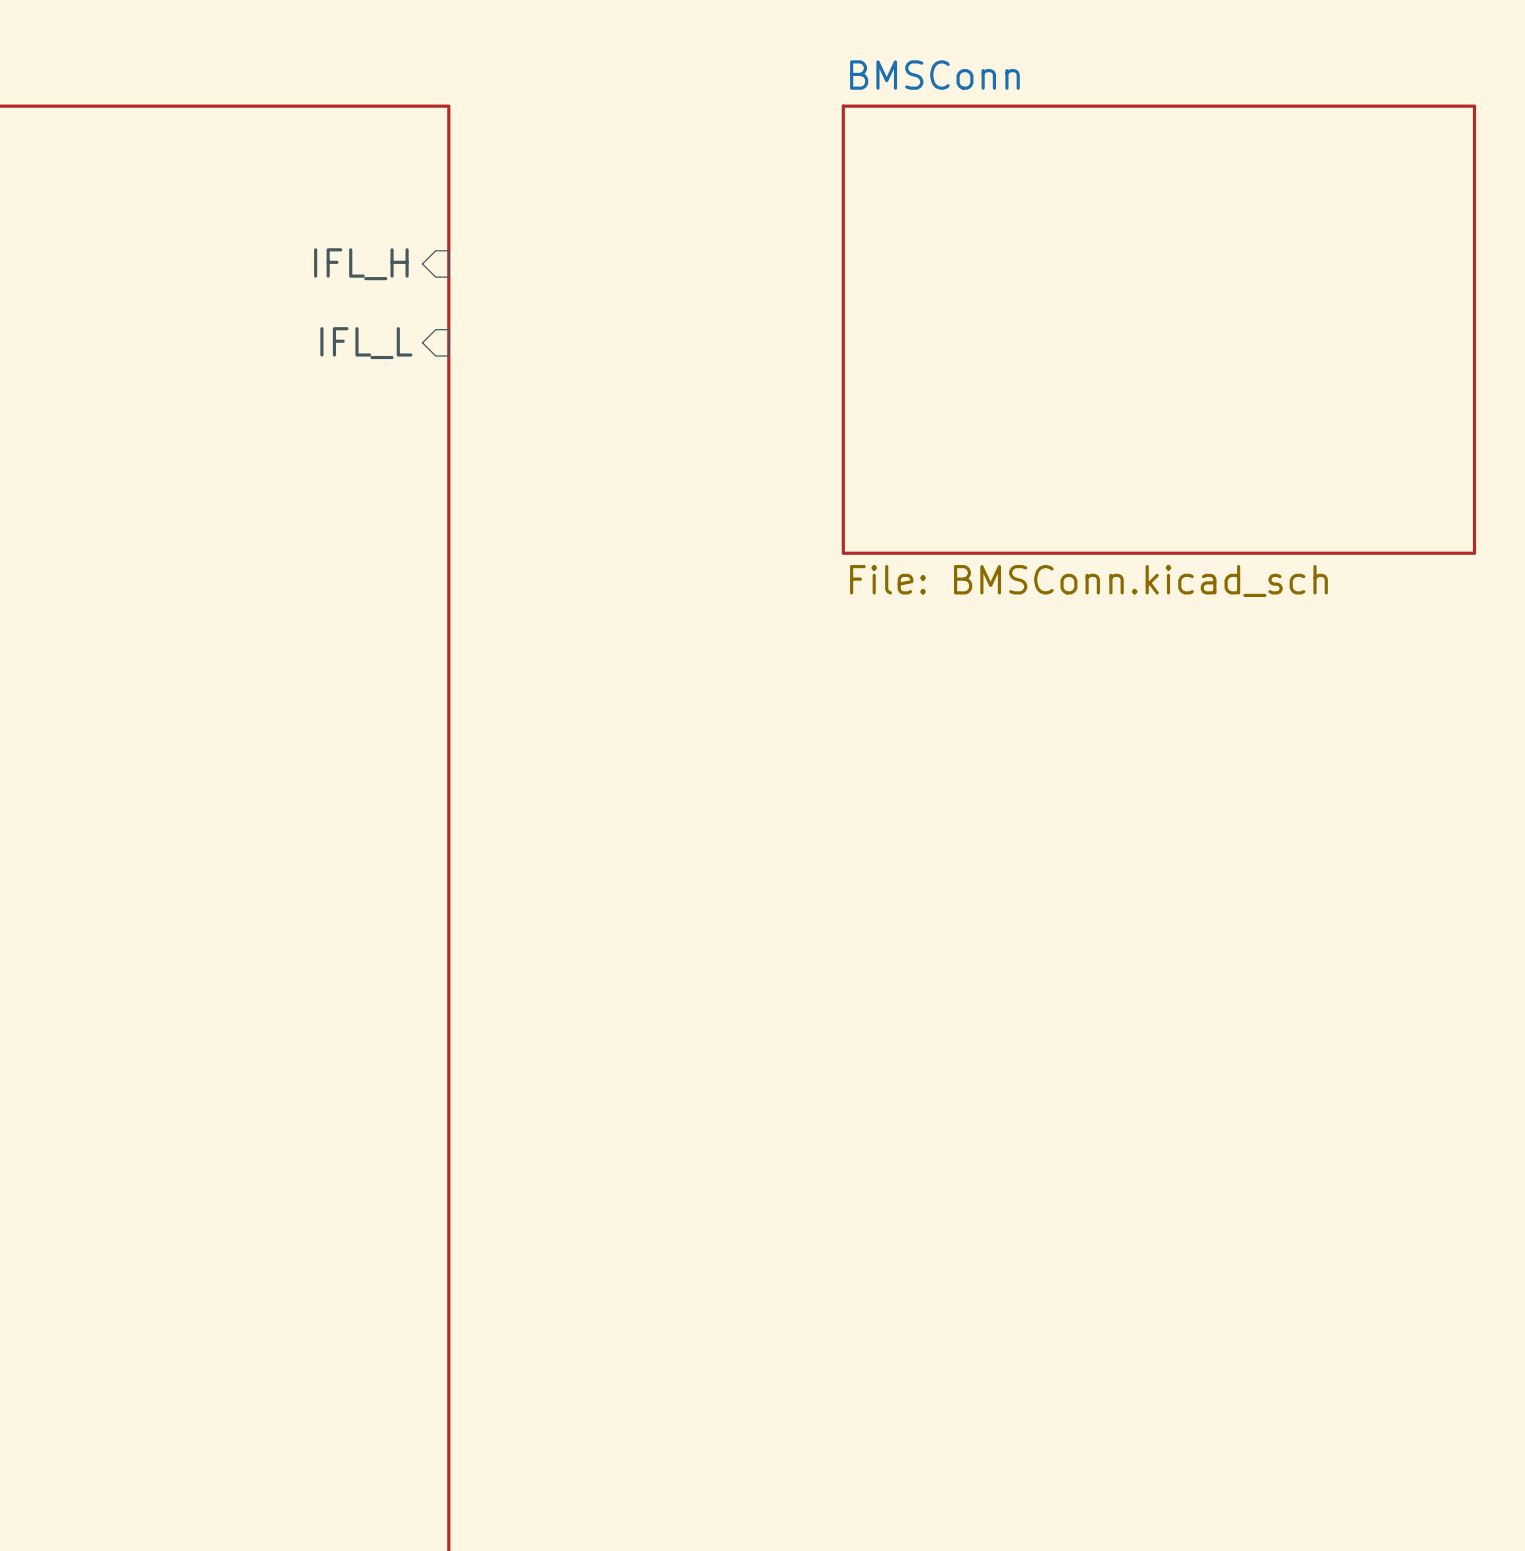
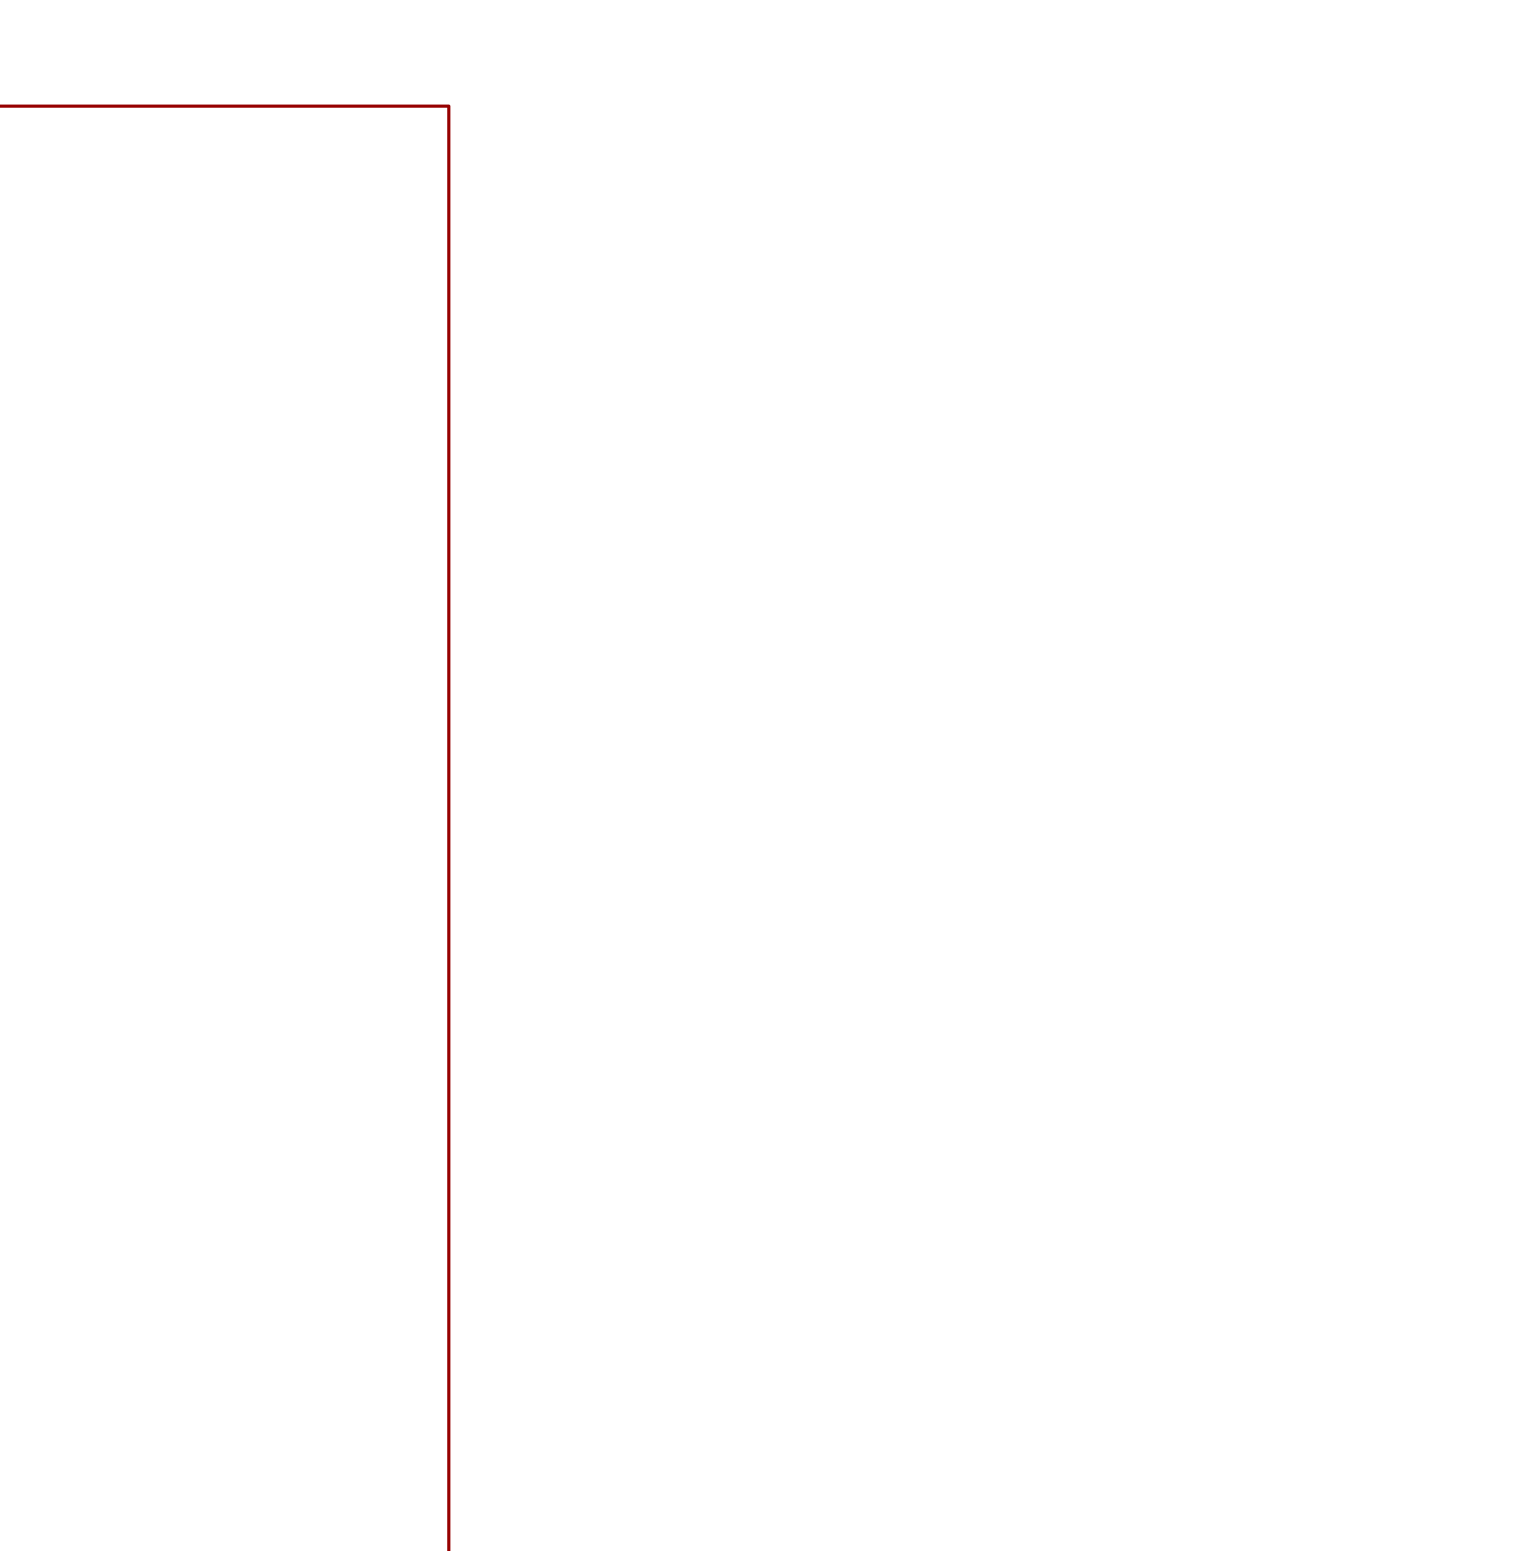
sheet pin: IFL_H (361, 264) -> none
sheet BMSConn: File: BMSConn.kicad_sch (1158, 329) -> none
sheet pin: IFL_L (366, 343) -> none

